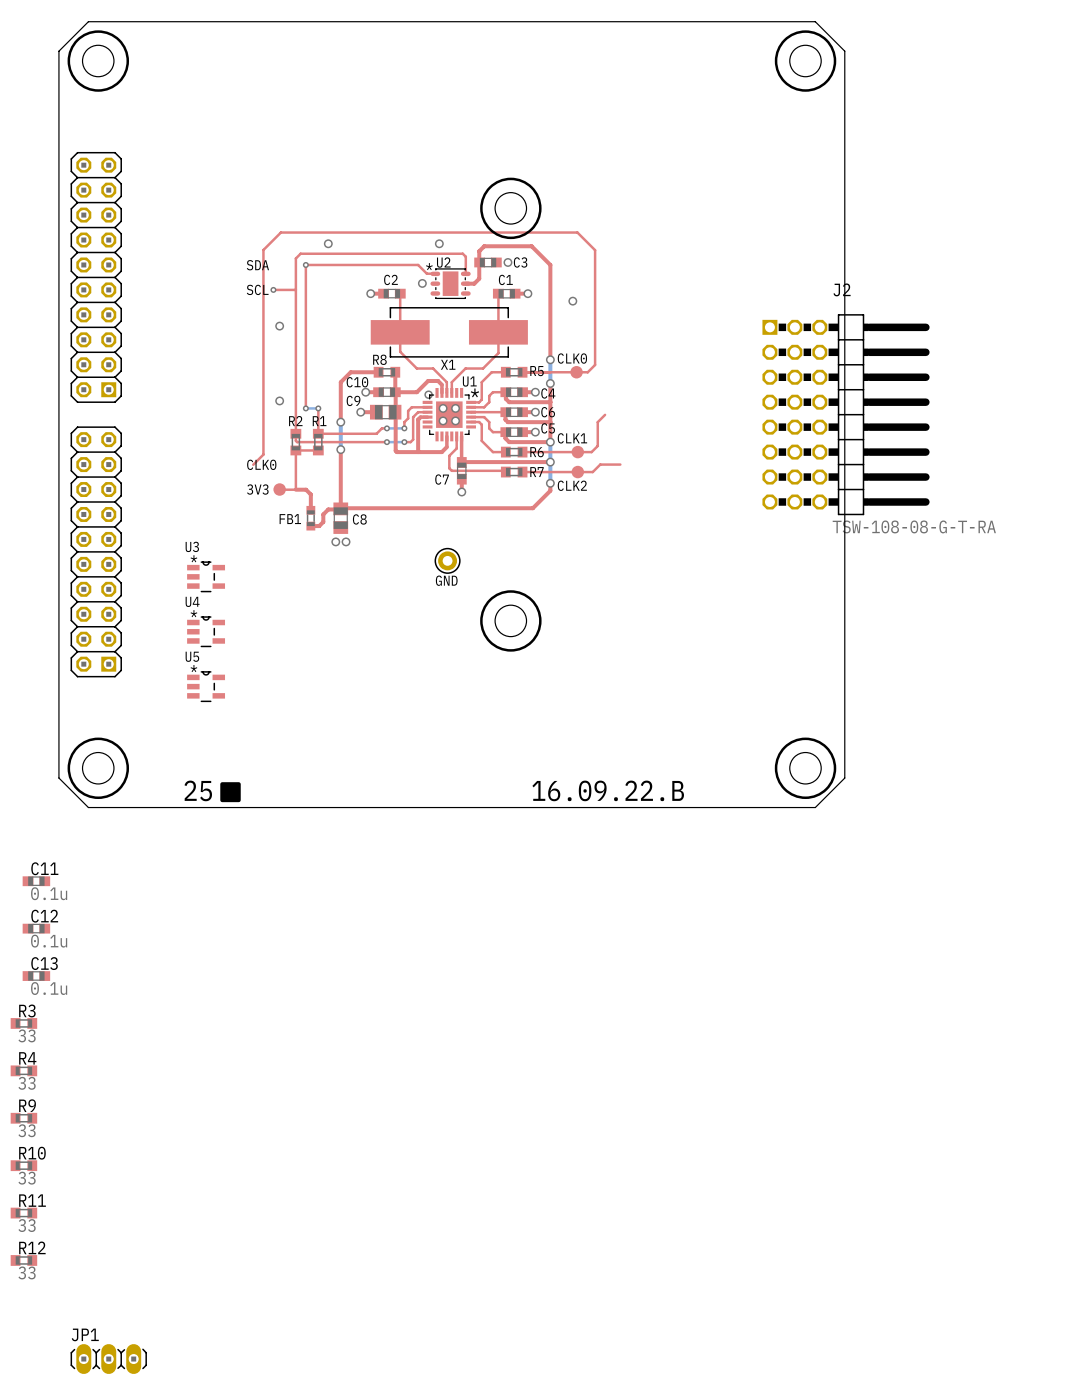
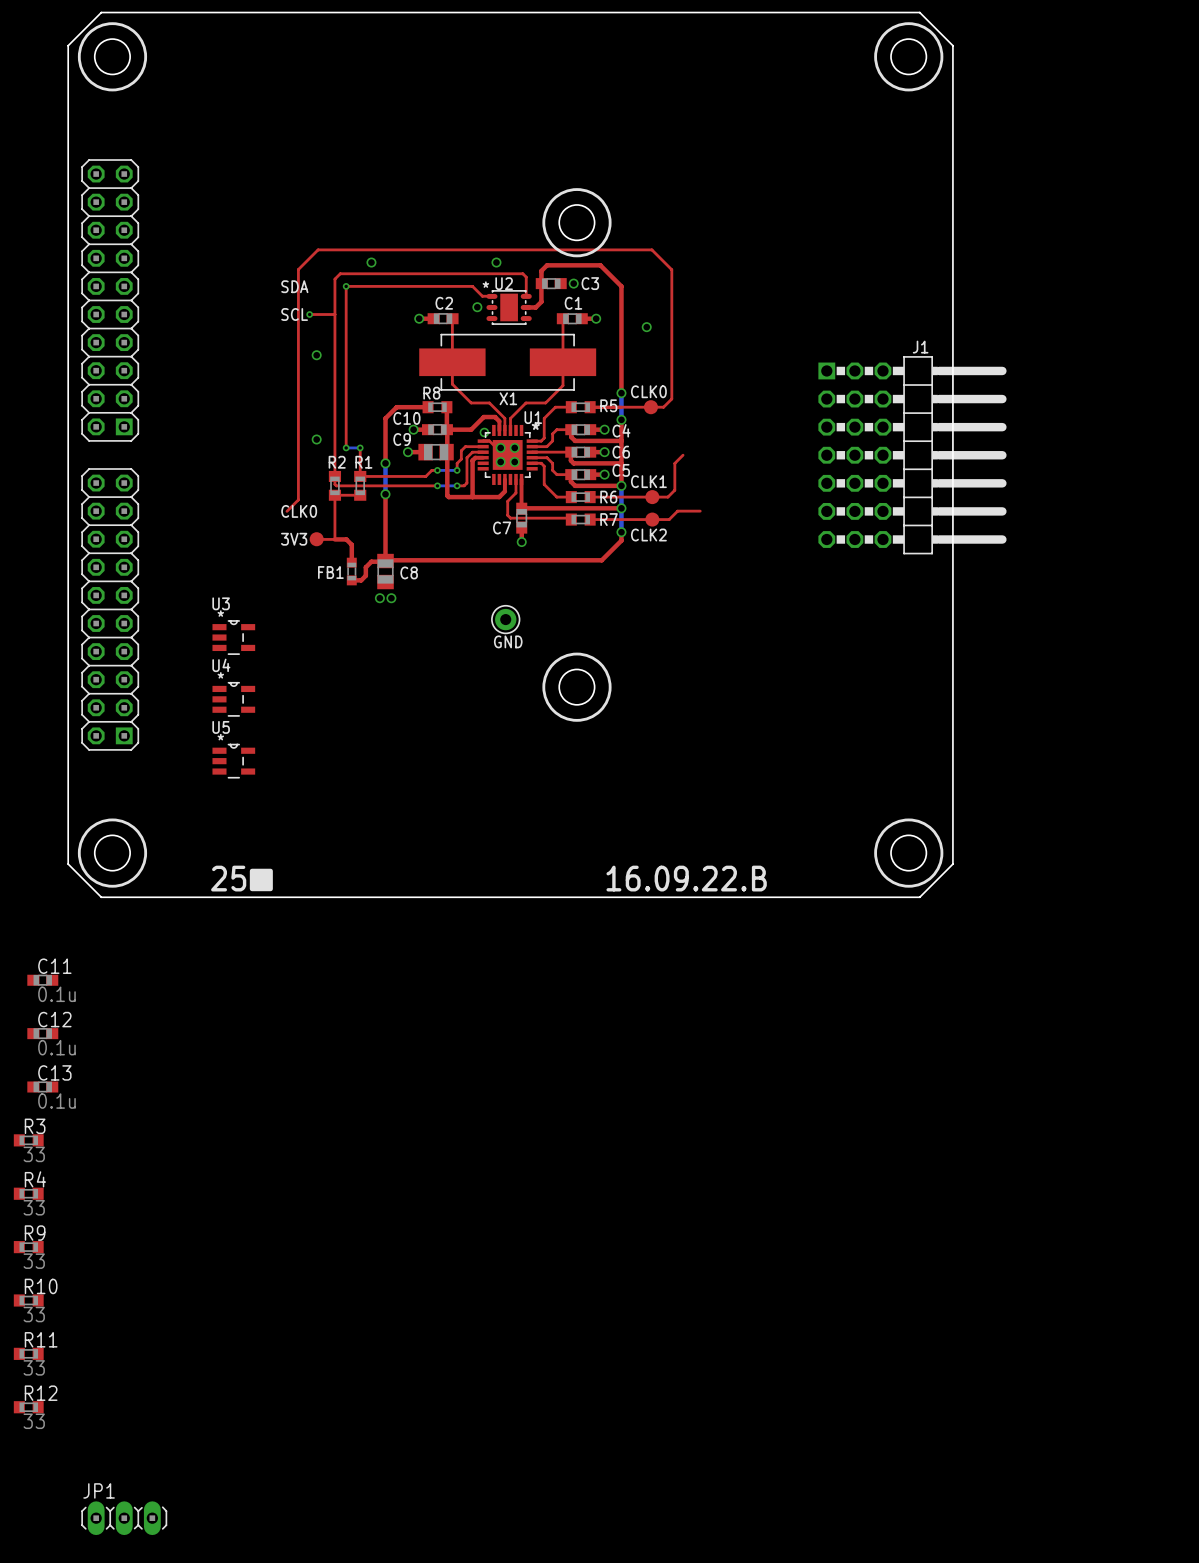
top track: none -> (483, 441) (489, 440) (495, 446)
J1: none -> (912, 455)
J2: TSW-108-08-G-T-RA (846, 414) -> none

